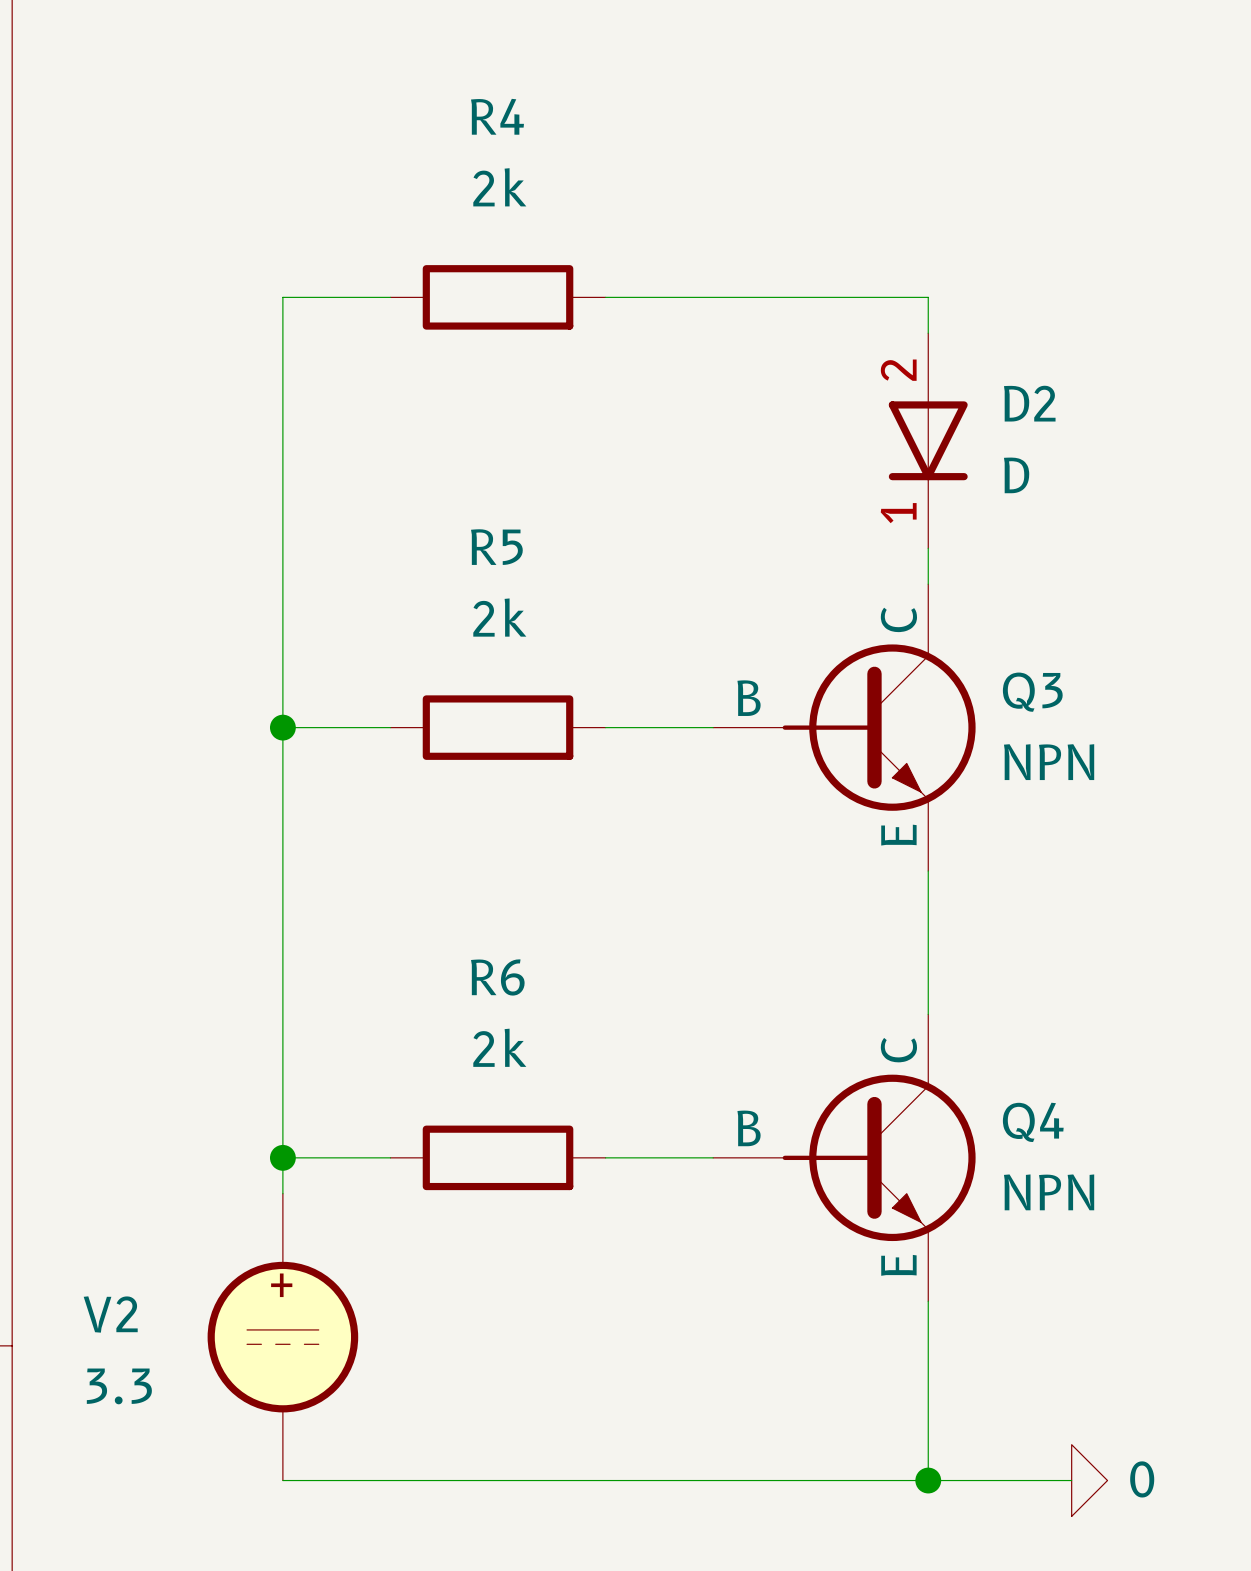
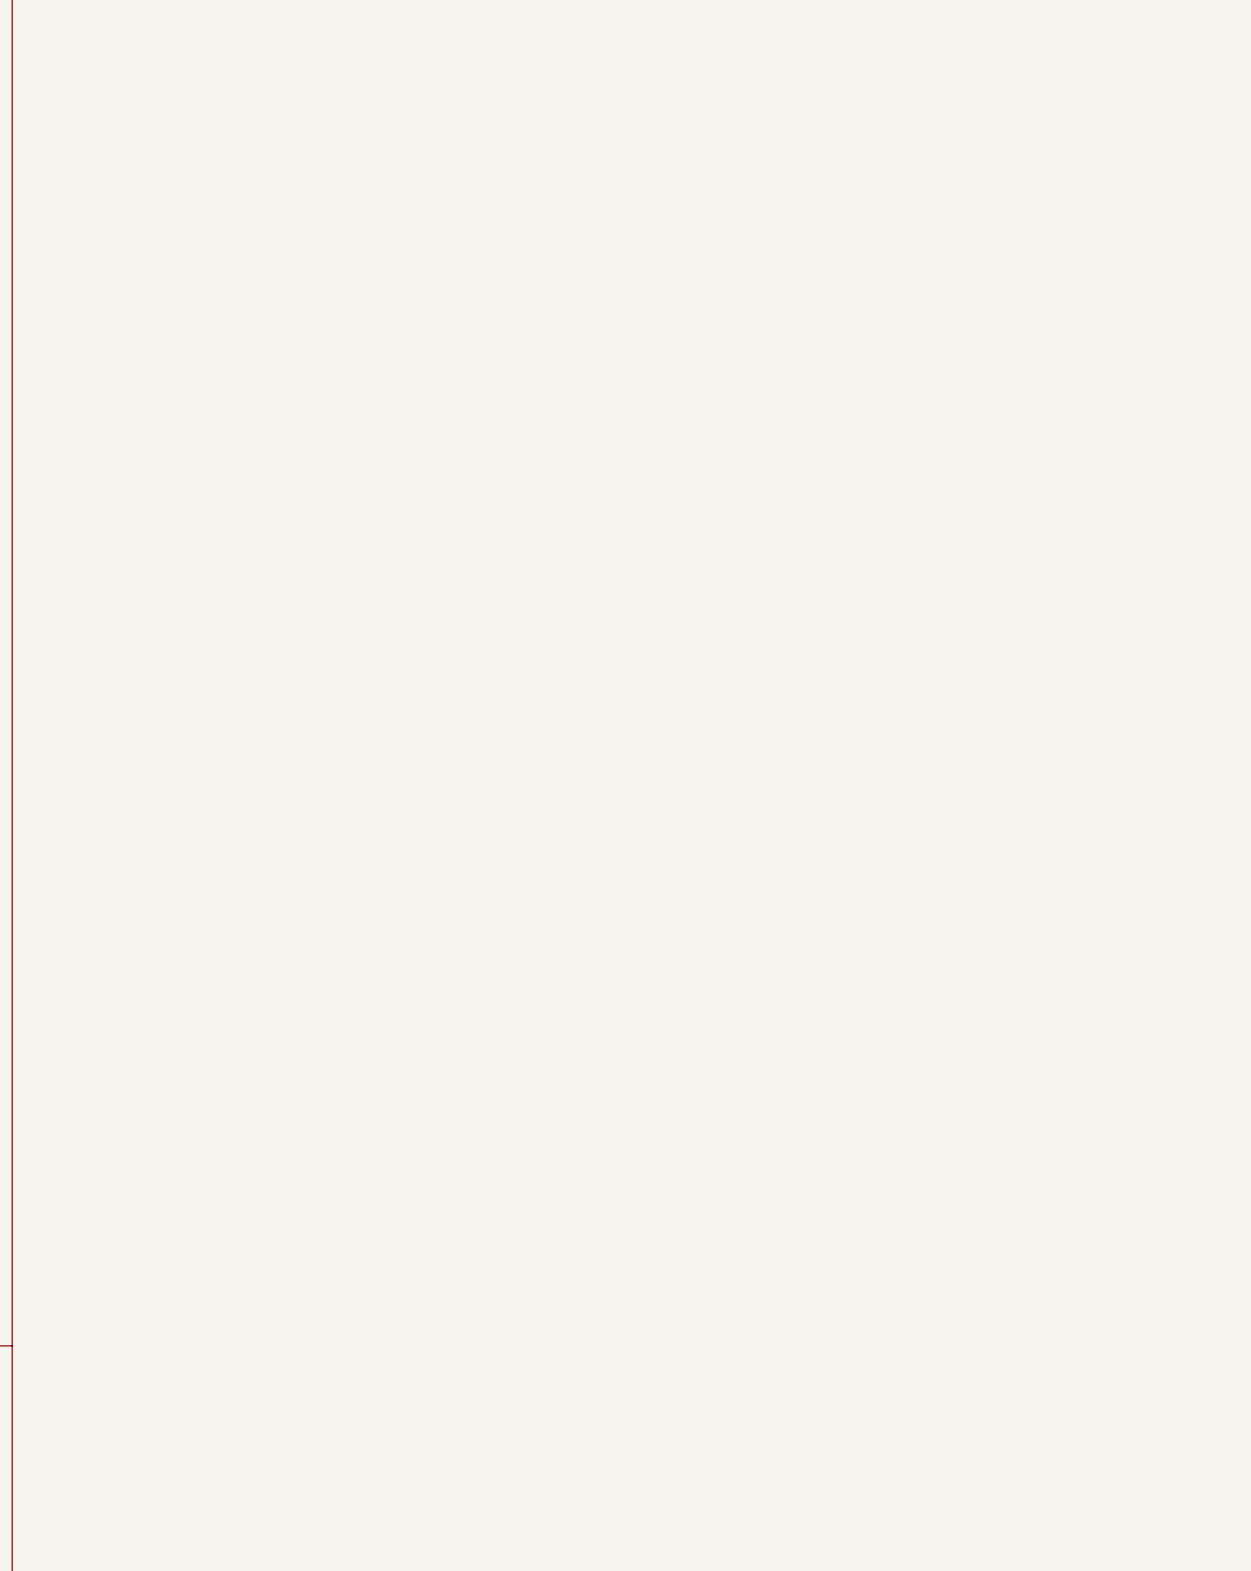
wire: (390, 297) (282, 297) (282, 1193) -> none
R4: 2k (498, 297) -> none
wire: (605, 297) (928, 297) (928, 333) -> none
D2: D (928, 440) -> none
wire: (928, 548) (928, 584) -> none
wire: (282, 727) (390, 727) -> none
junction: (282, 727) -> none
R5: 2k (498, 727) -> none
wire: (605, 727) (713, 727) -> none
Q3: NPN (844, 727) -> none
wire: (928, 871) (928, 1014) -> none
wire: (282, 1157) (390, 1157) -> none
junction: (282, 1157) -> none
R6: 2k (498, 1157) -> none
wire: (605, 1157) (713, 1157) -> none
Q4: NPN (844, 1157) -> none
wire: (928, 1301) (928, 1480) -> none
V2: 3.3 (282, 1337) -> none
wire: (282, 1480) (1071, 1480) -> none
junction: (928, 1480) -> none
power symbol: 0 (1089, 1480) -> none

